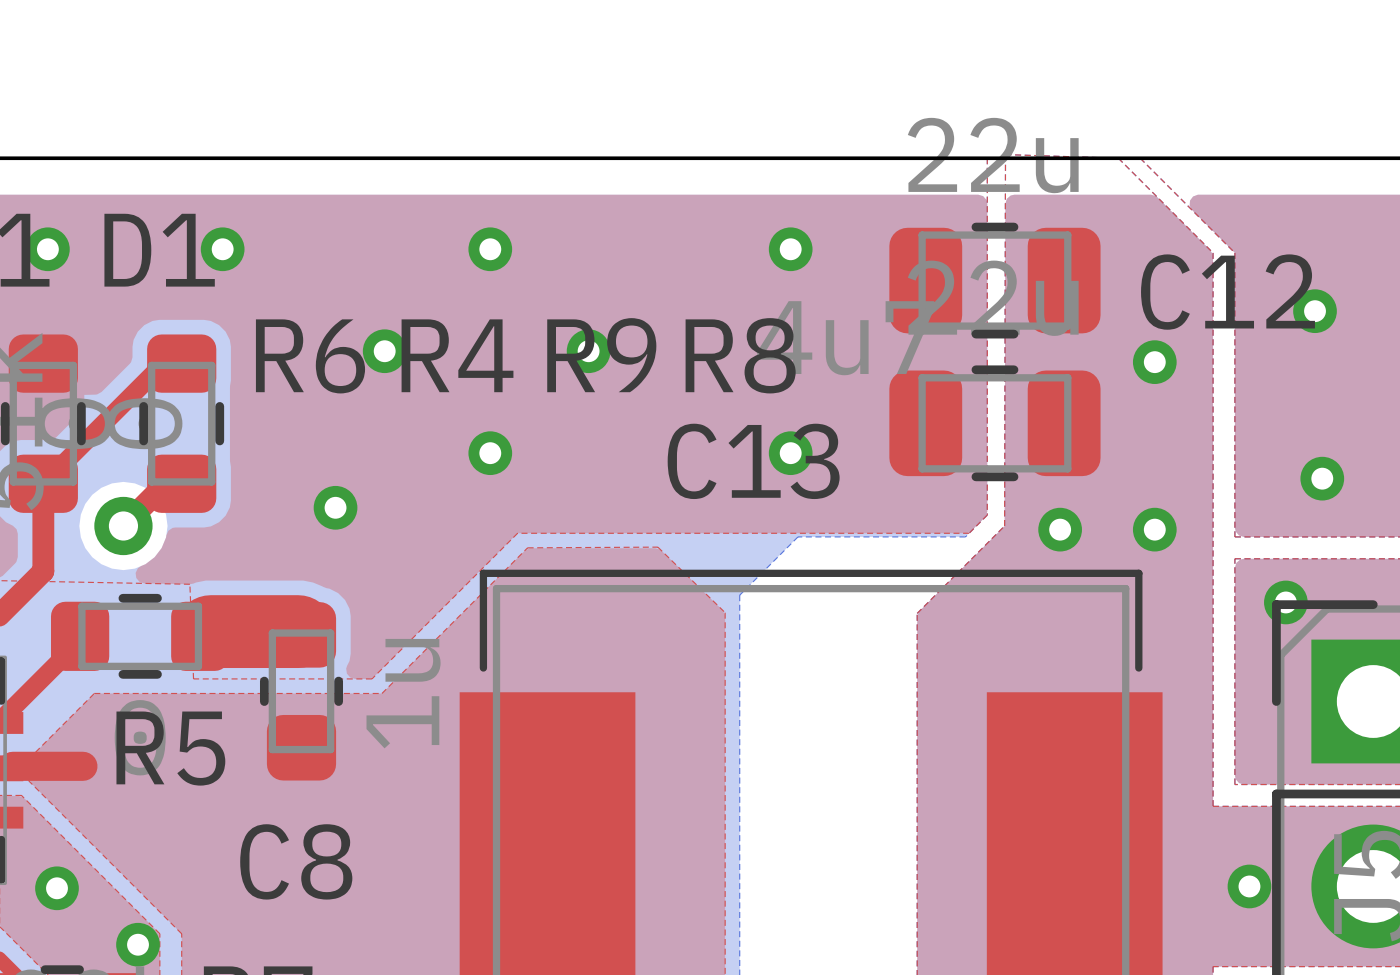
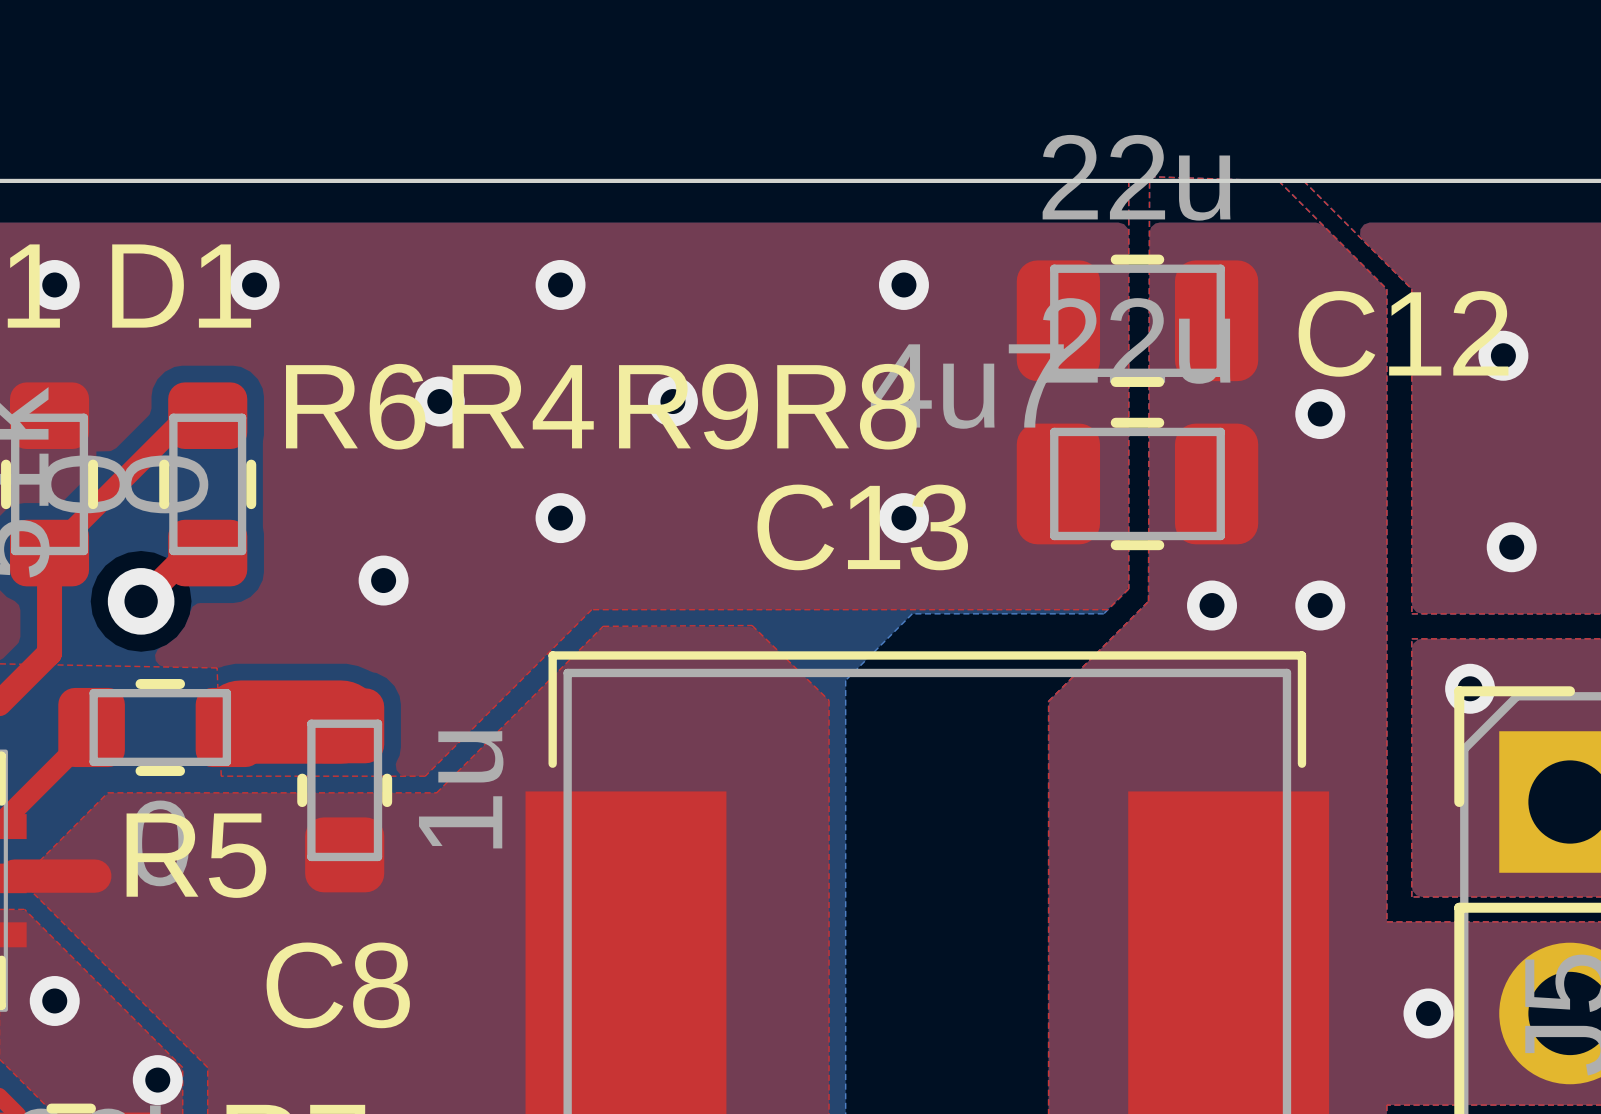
via position: (56, 888) -> (54, 1000)

